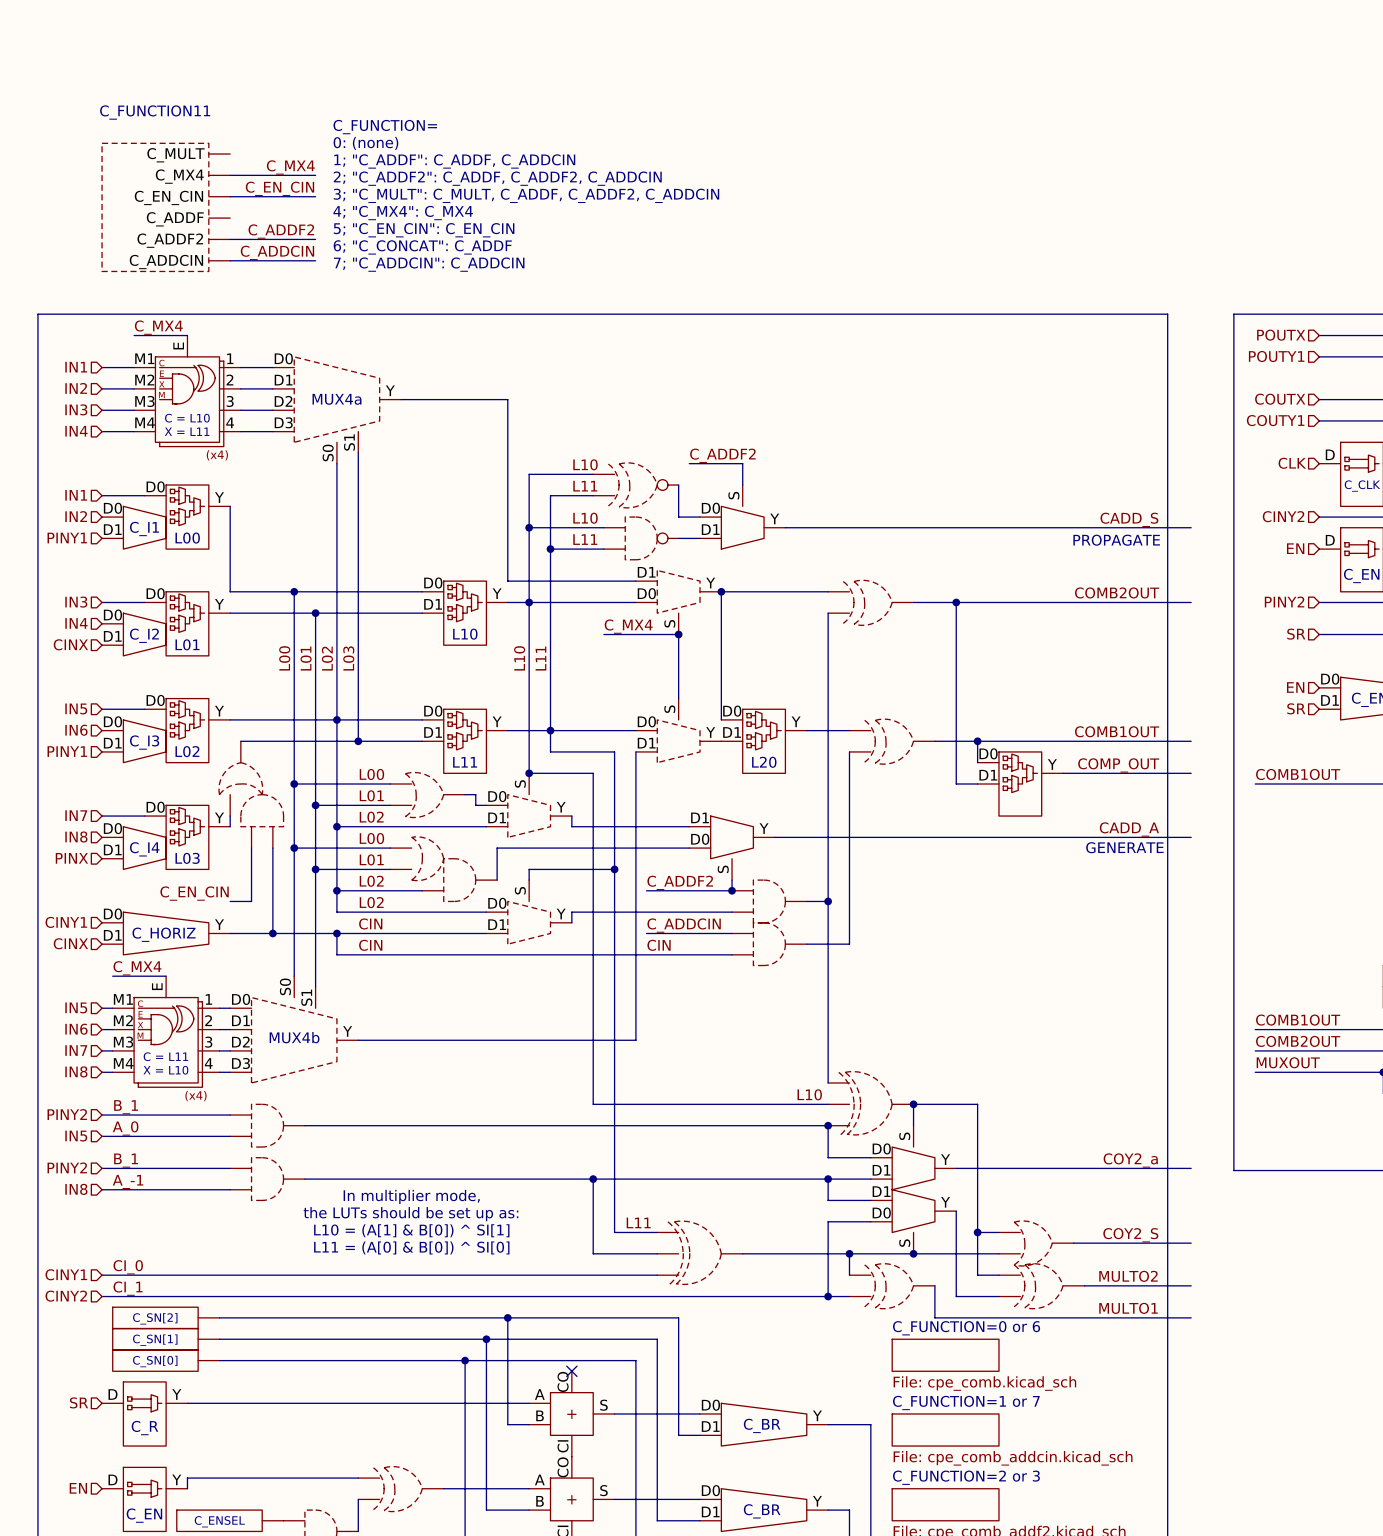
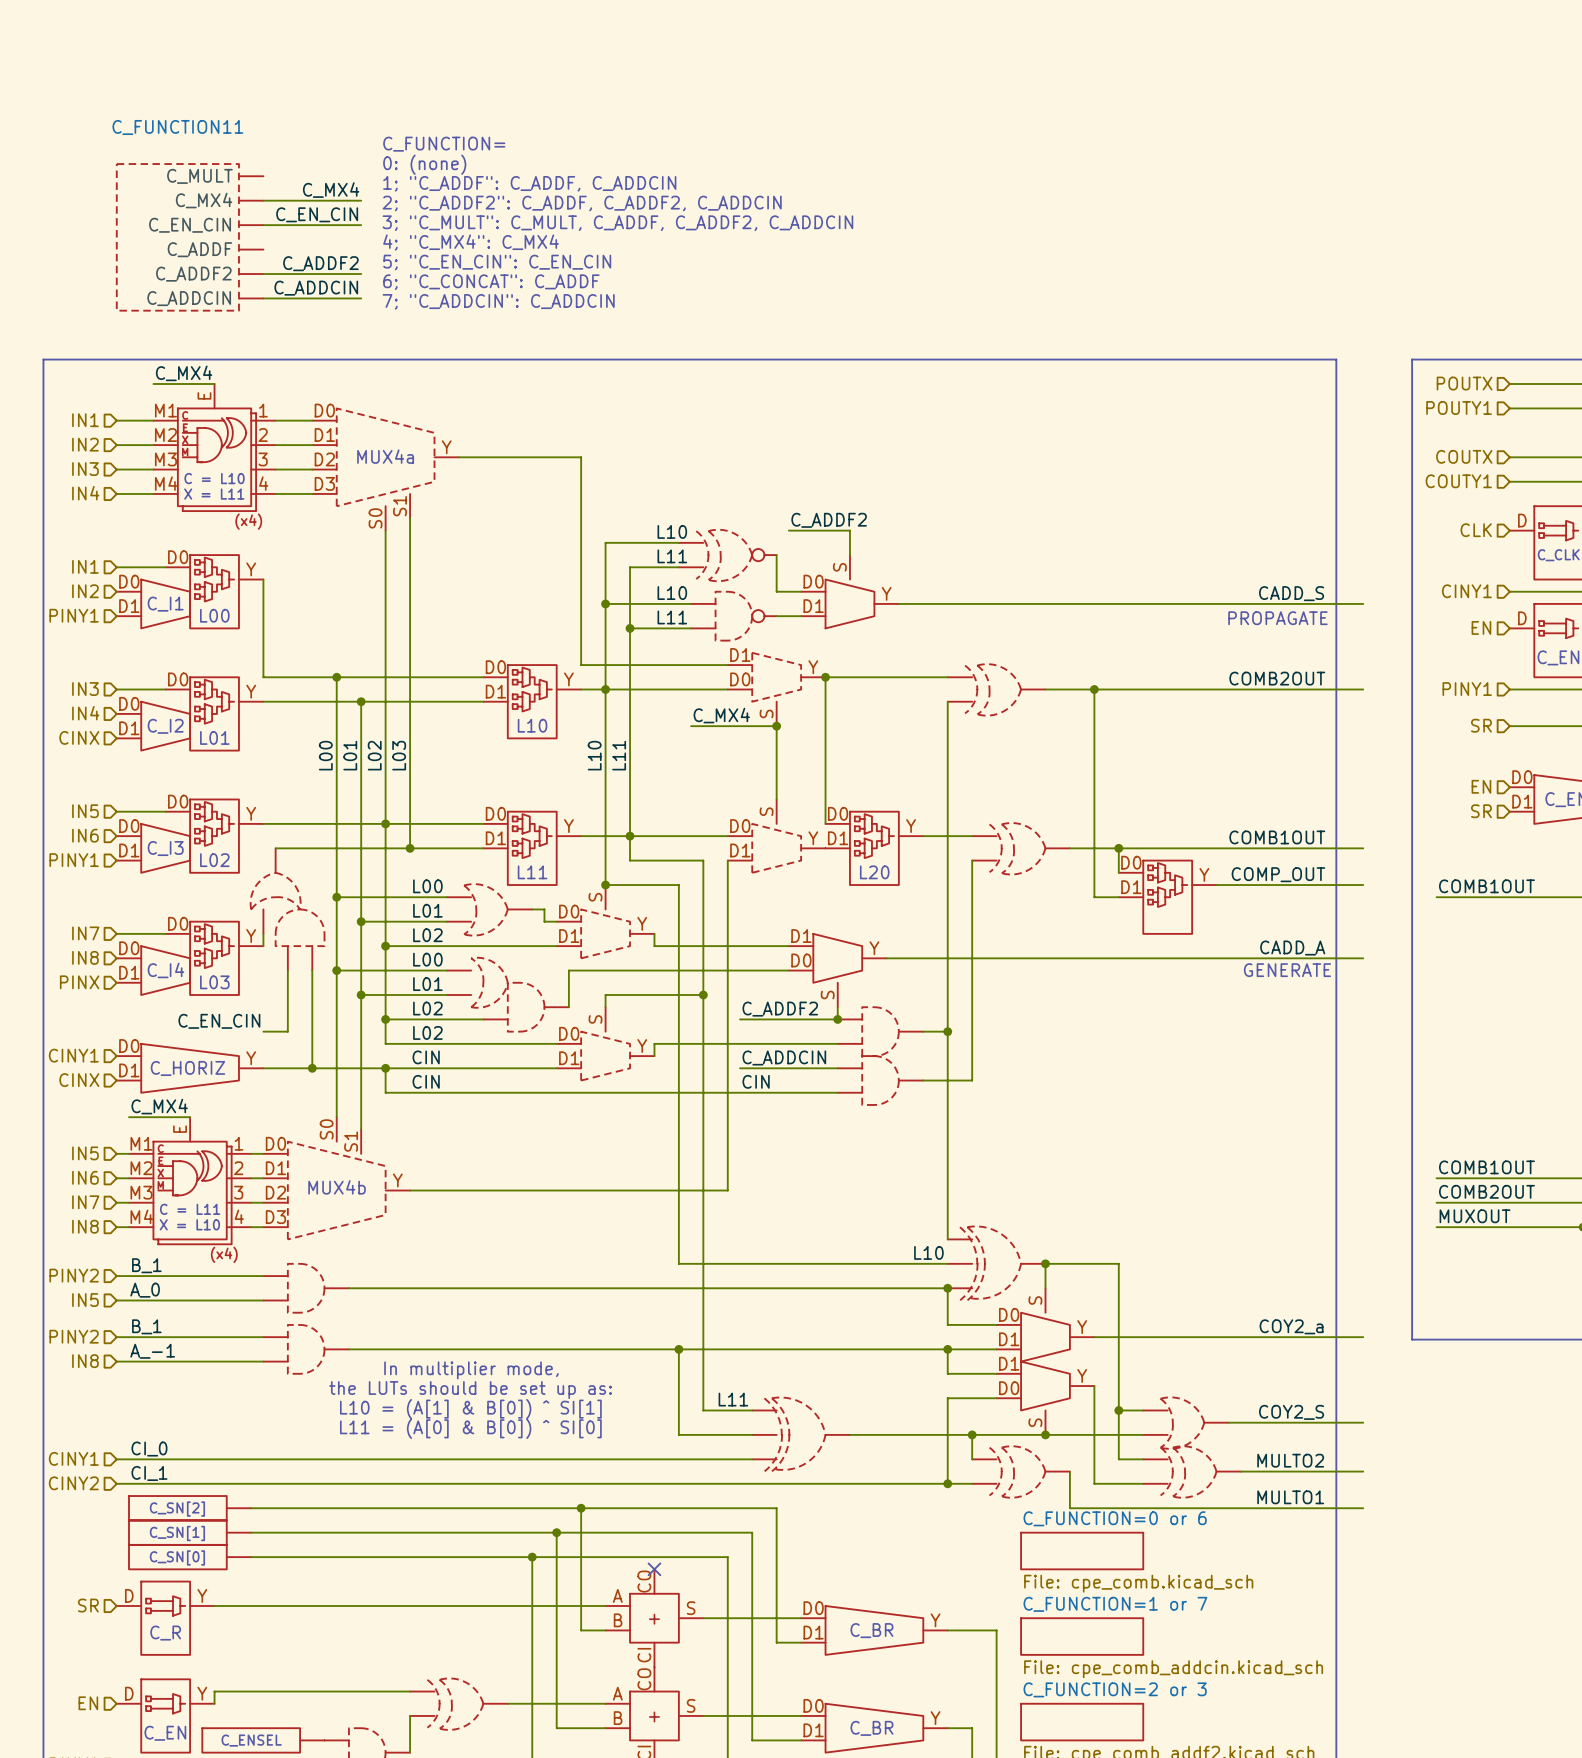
hierarchical label: CINY2 (1283, 516) -> CINY1 (1466, 591)
hierarchical label: PINY2 (1284, 601) -> PINY1 (1467, 689)

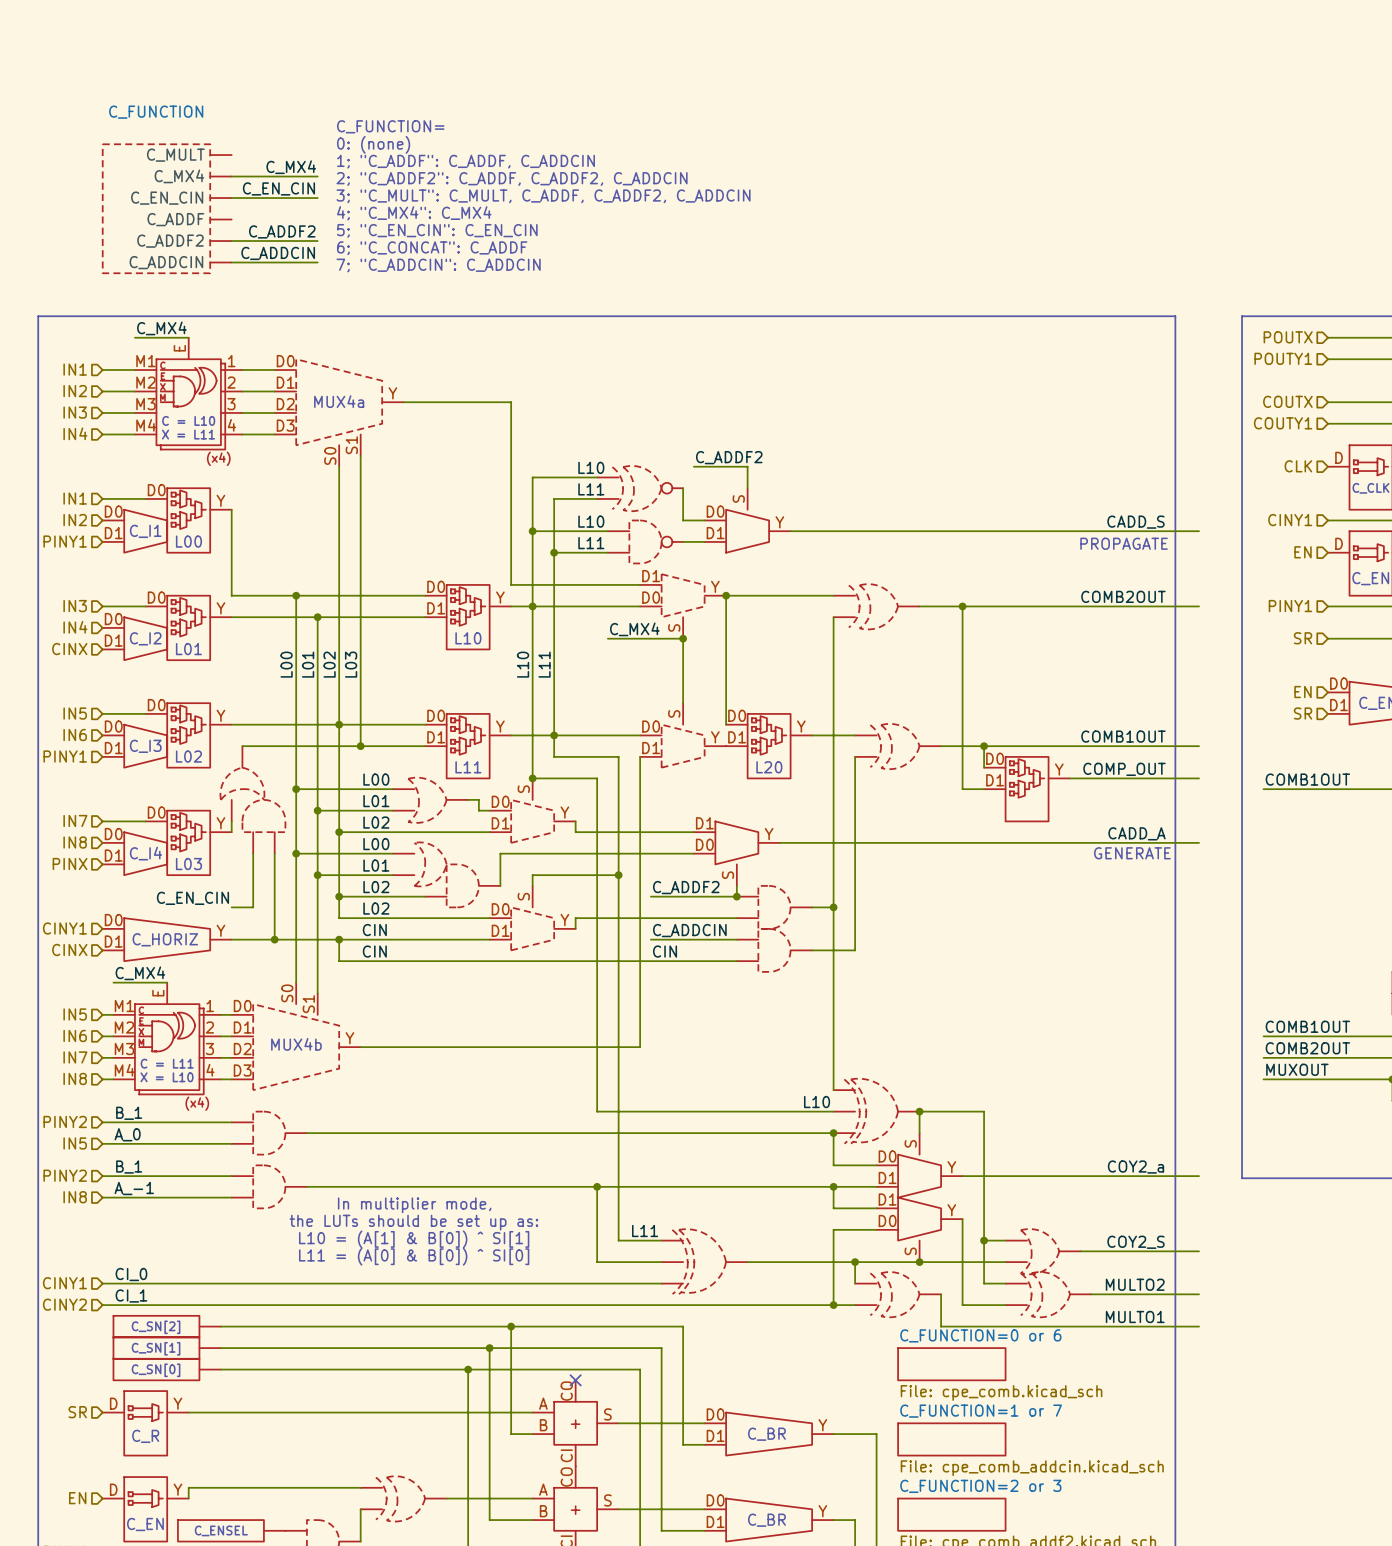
C_FUNCTION11 name: C_FUNCTION11 (177, 127) -> C_FUNCTION (156, 112)

